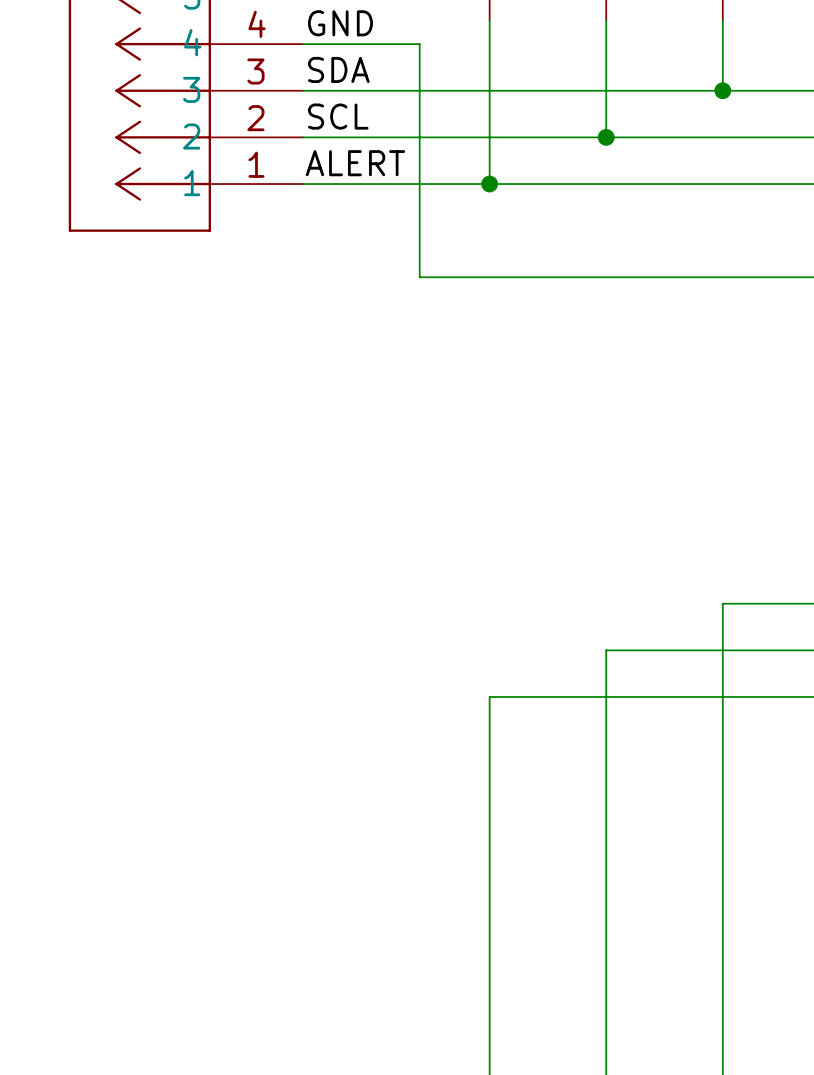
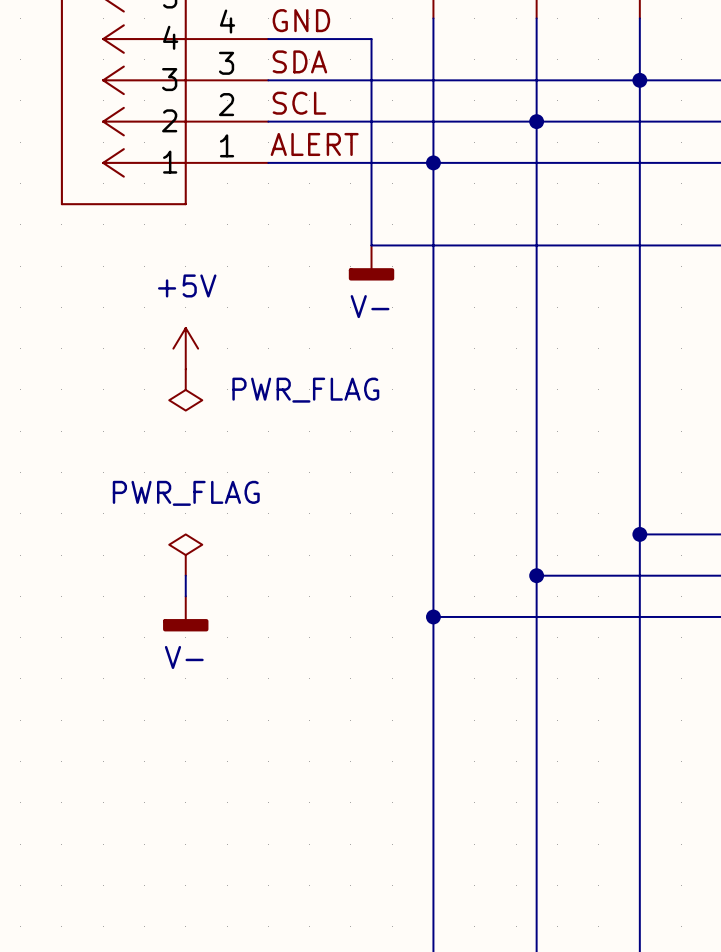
wire: none -> (639, 80) (639, 534)
wire: none -> (536, 121) (536, 575)
wire: none -> (433, 162) (433, 616)
power symbol: none -> V- (371, 263)
power symbol: none -> +5V (185, 348)
power symbol: none -> PWR_FLAG (185, 389)
junction: none -> (639, 534)
power symbol: none -> PWR_FLAG (185, 555)
wire: none -> (185, 575) (185, 596)
junction: none -> (536, 575)
power symbol: none -> V- (185, 613)
junction: none -> (433, 616)

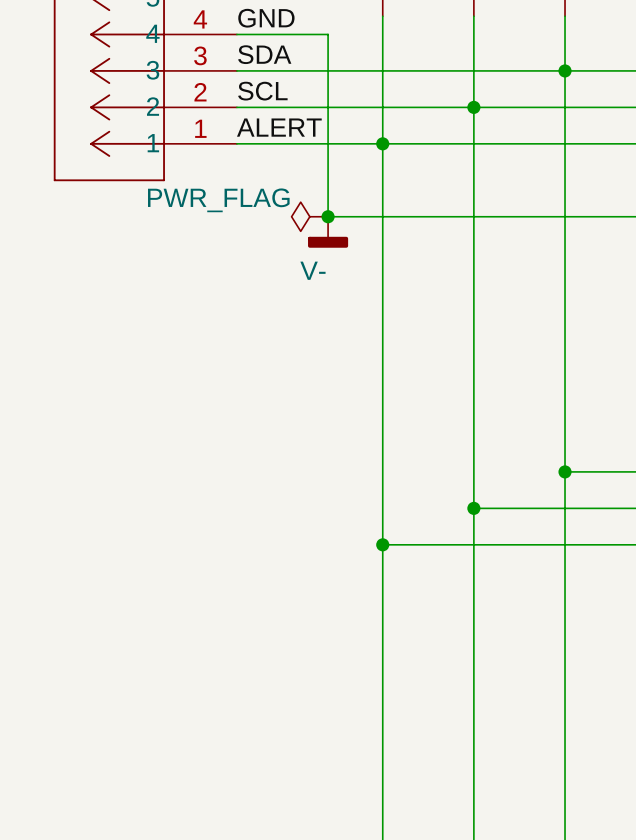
power symbol: none -> PWR_FLAG (309, 216)
junction: none -> (328, 216)
power symbol text position: V- (370, 306) -> V- (312, 270)
power symbol: +5V (185, 348) -> none
power symbol: PWR_FLAG (185, 389) -> none
power symbol: PWR_FLAG (185, 555) -> none
wire: (185, 575) (185, 596) -> none
power symbol: V- (185, 613) -> none

